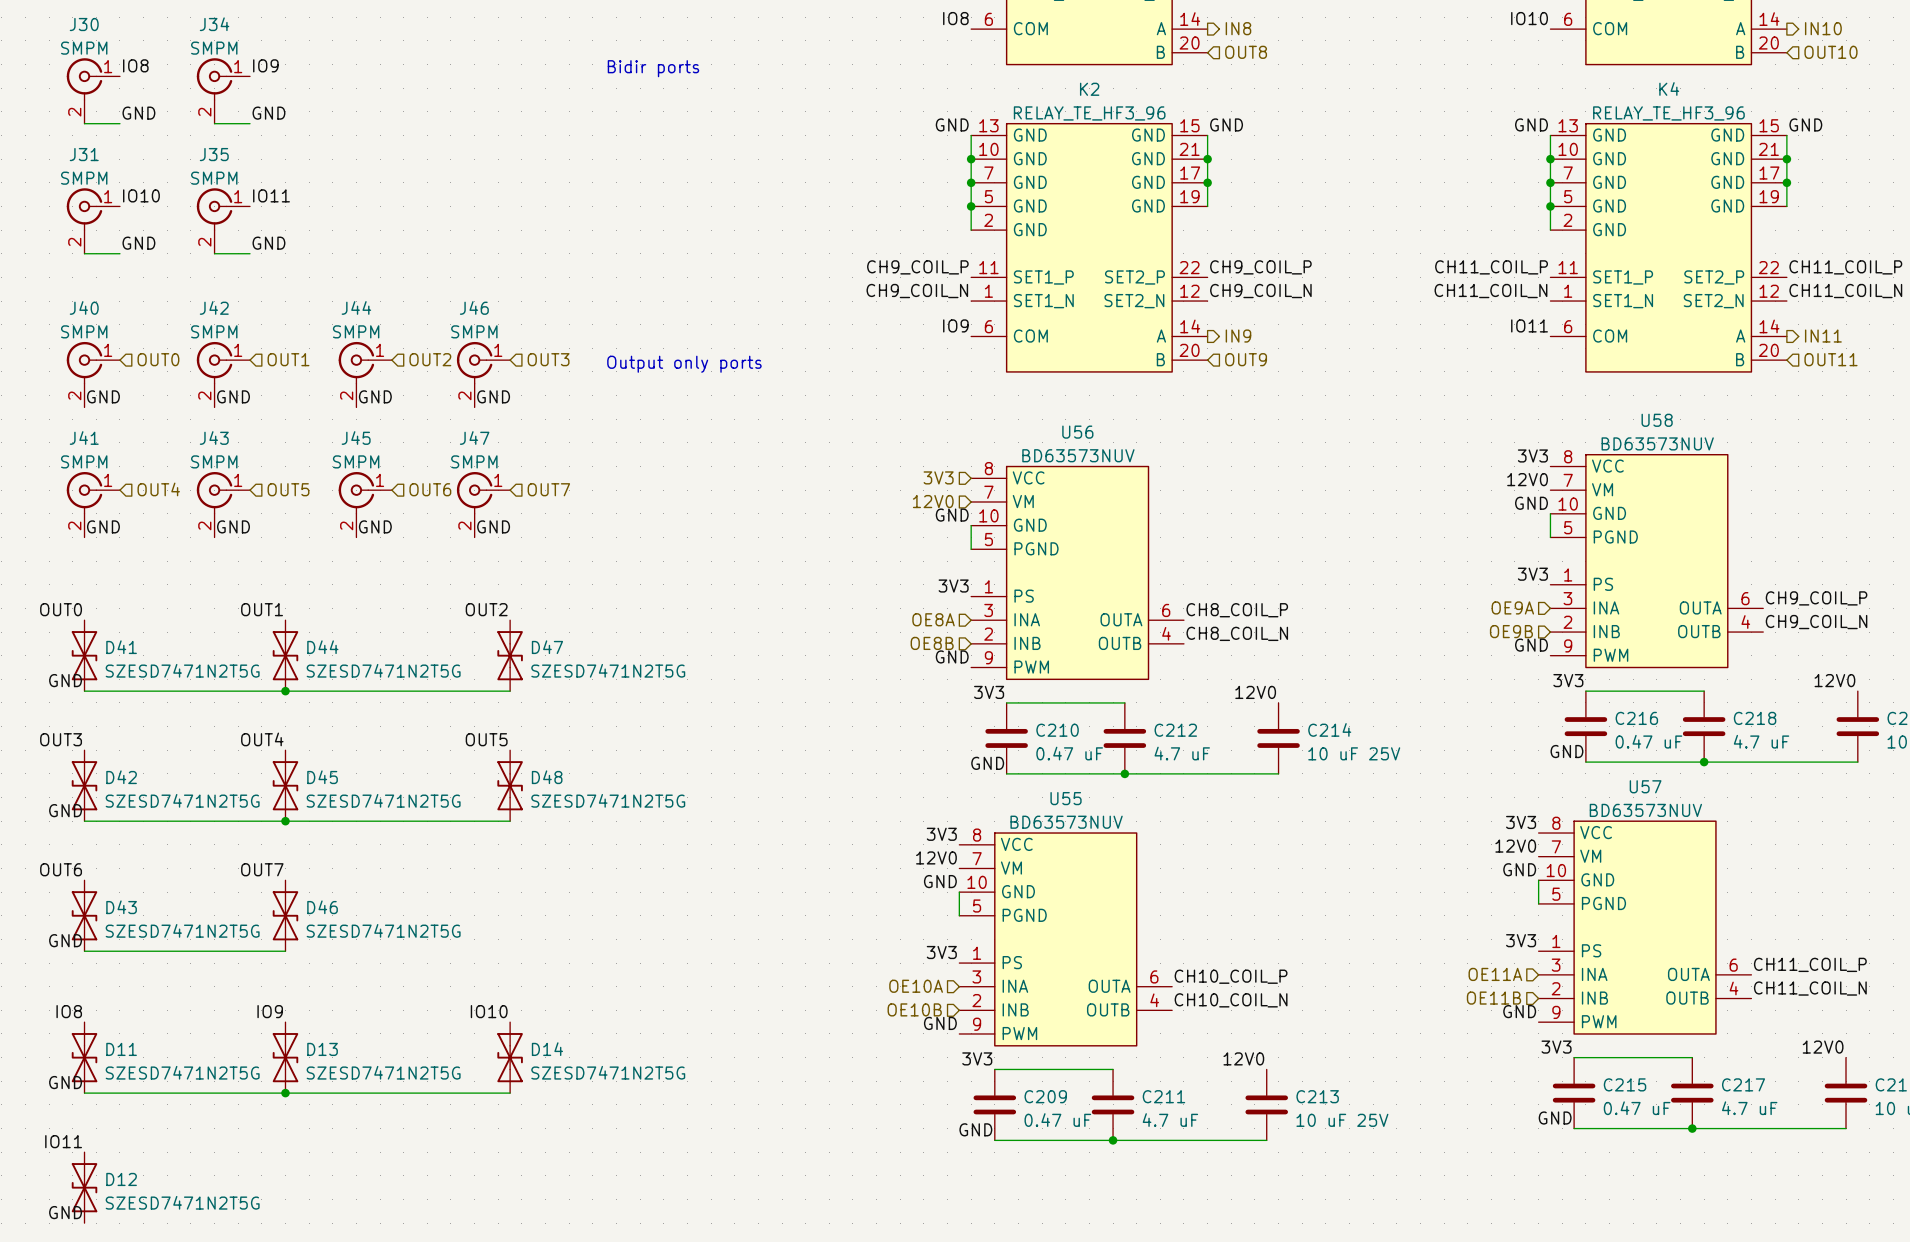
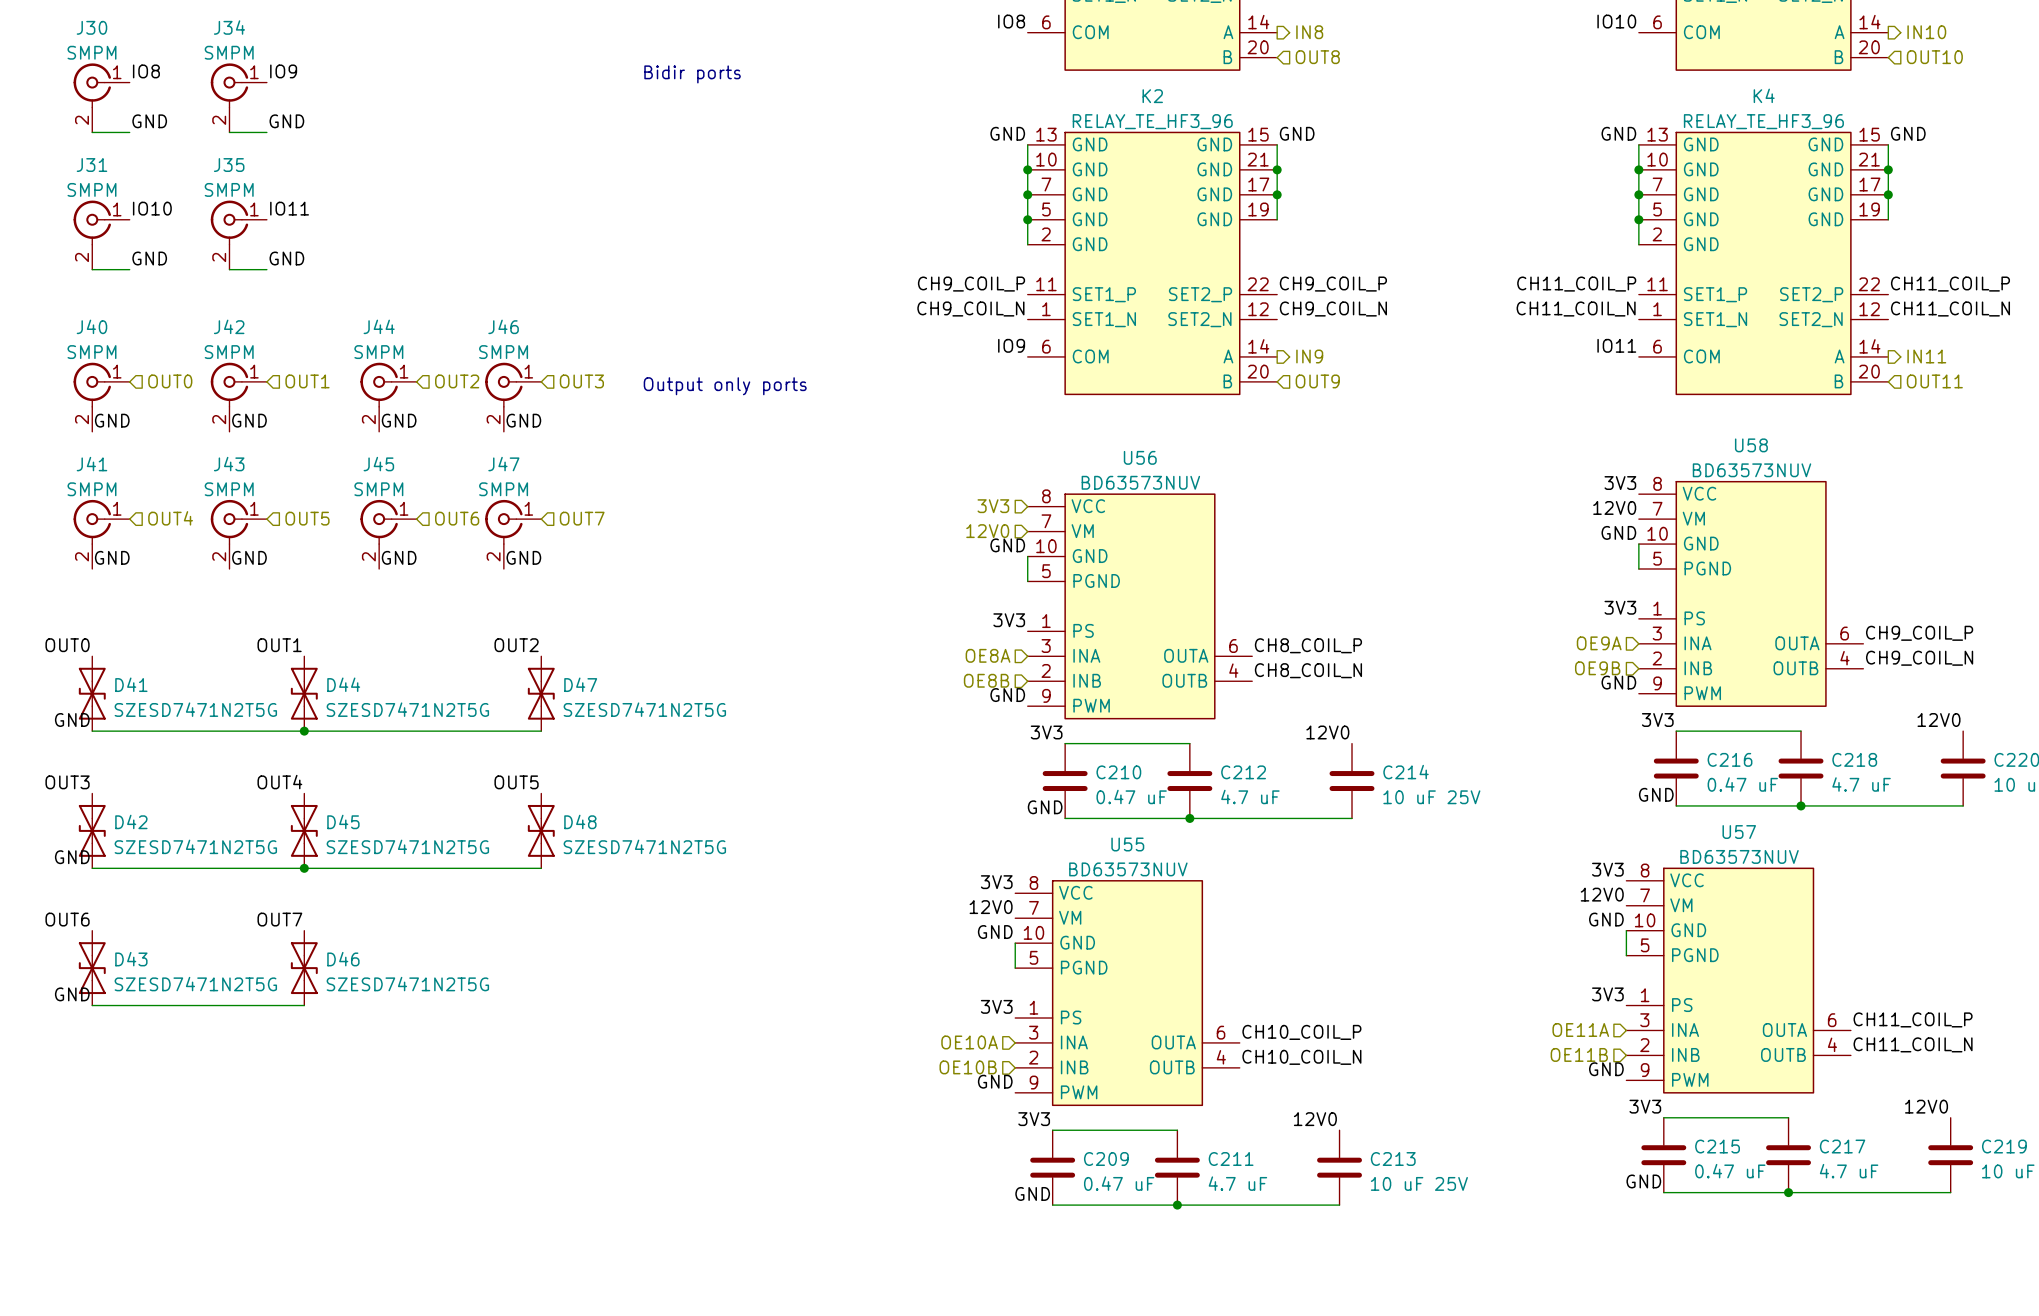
label: IO8 (69, 1011) -> none
label: IO9 (270, 1011) -> none
label: IO10 (489, 1011) -> none
D11: SZESD7471N2T5G (84, 1057) -> none
D13: SZESD7471N2T5G (285, 1057) -> none
D14: SZESD7471N2T5G (510, 1057) -> none
label: GND (65, 1082) -> none
wire: (84, 1093) (510, 1093) -> none
junction: (285, 1093) -> none
label: IO11 (63, 1141) -> none
D12: SZESD7471N2T5G (84, 1187) -> none
label: GND (65, 1212) -> none

